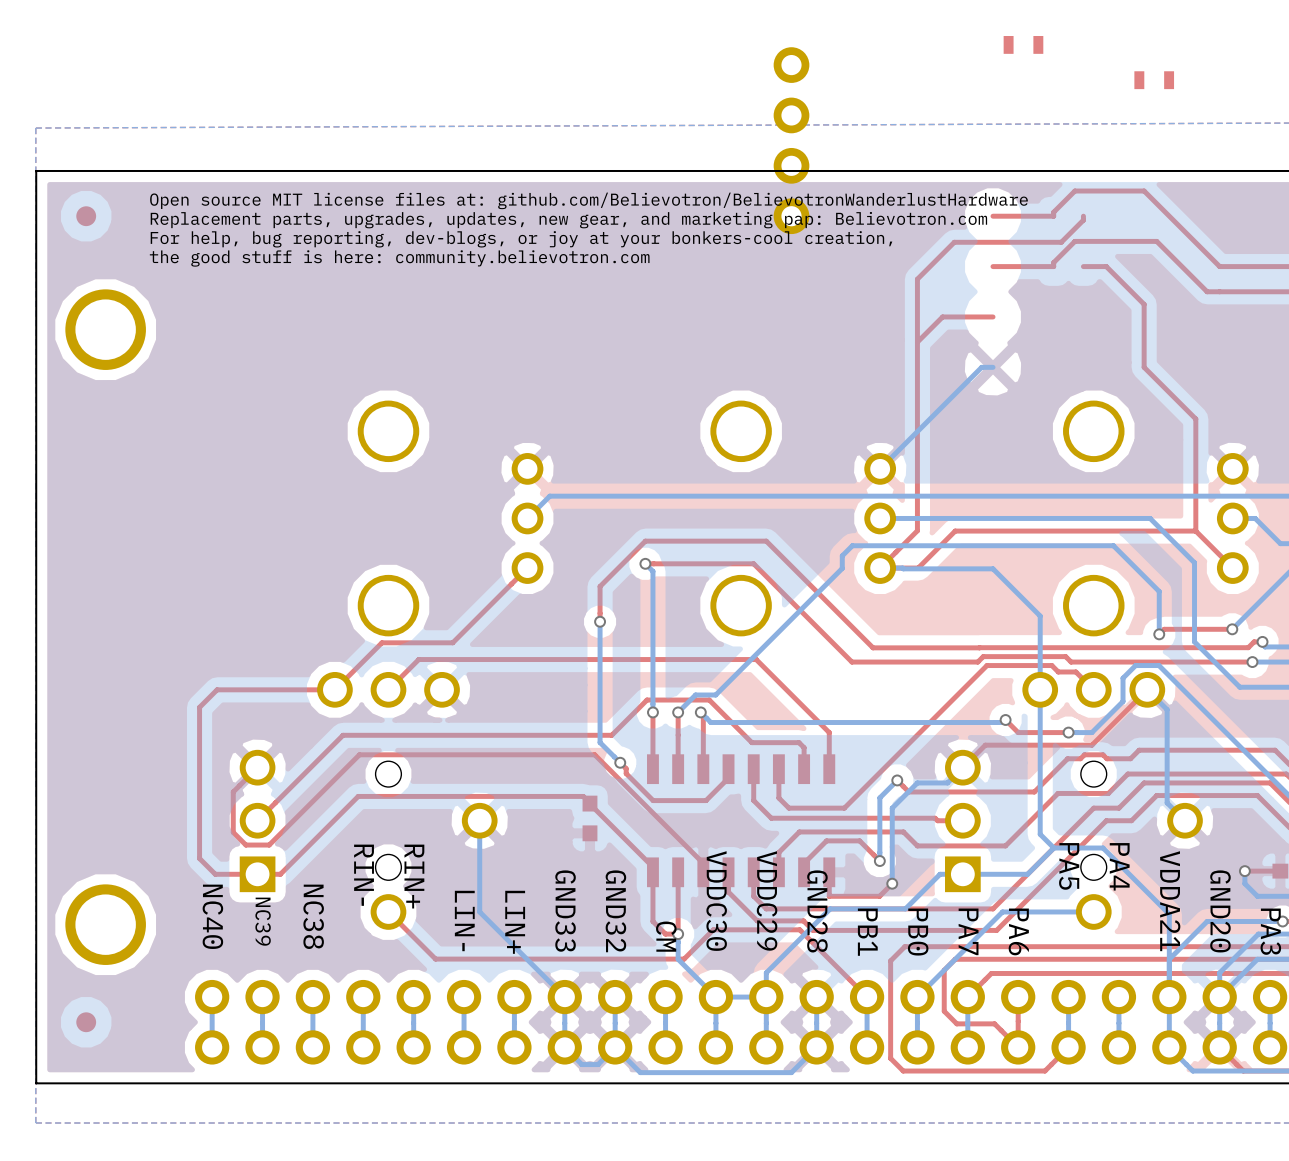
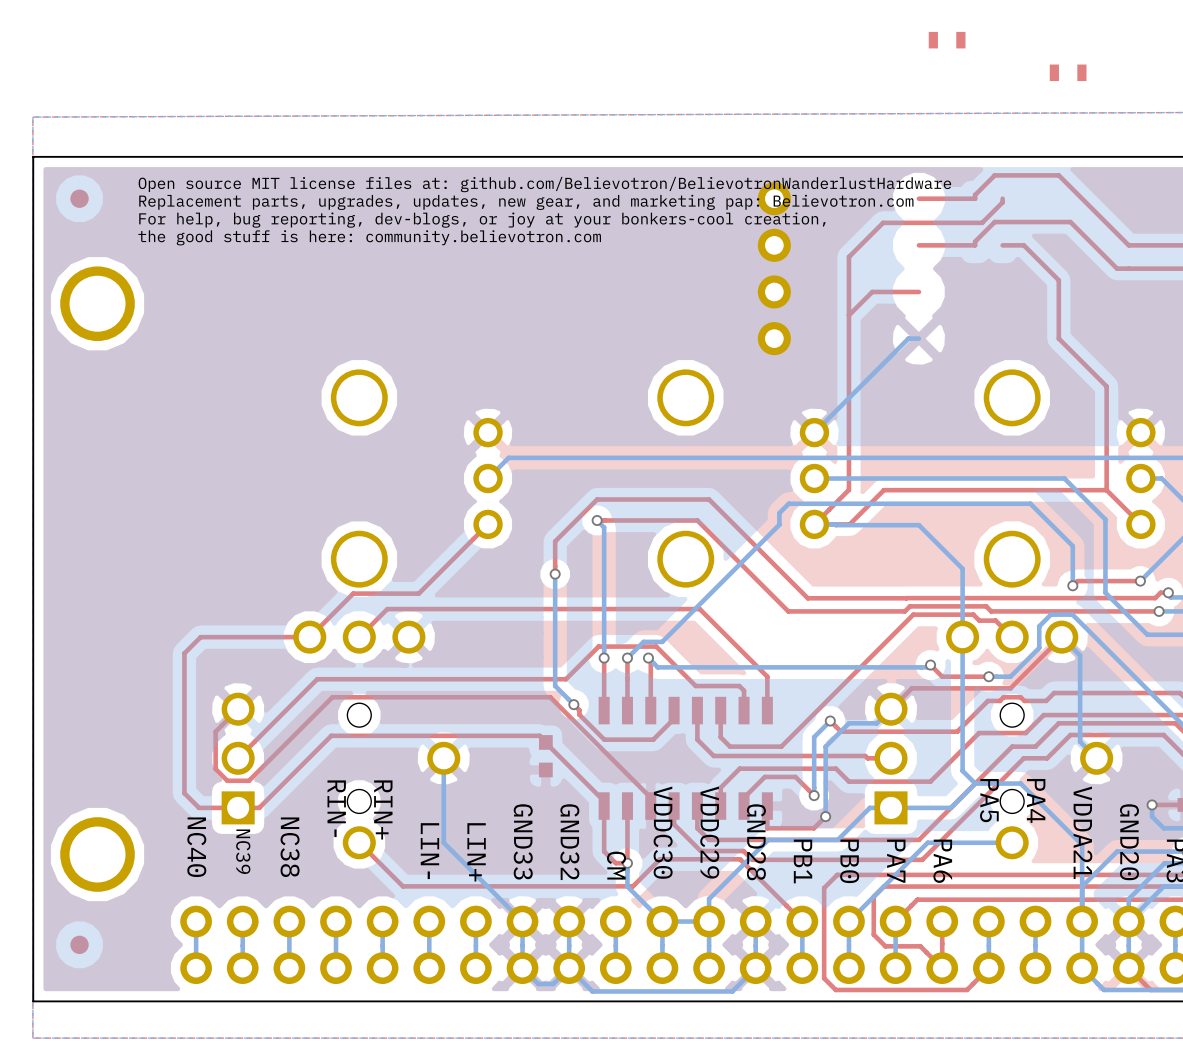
part position: (791, 140) -> (774, 268)

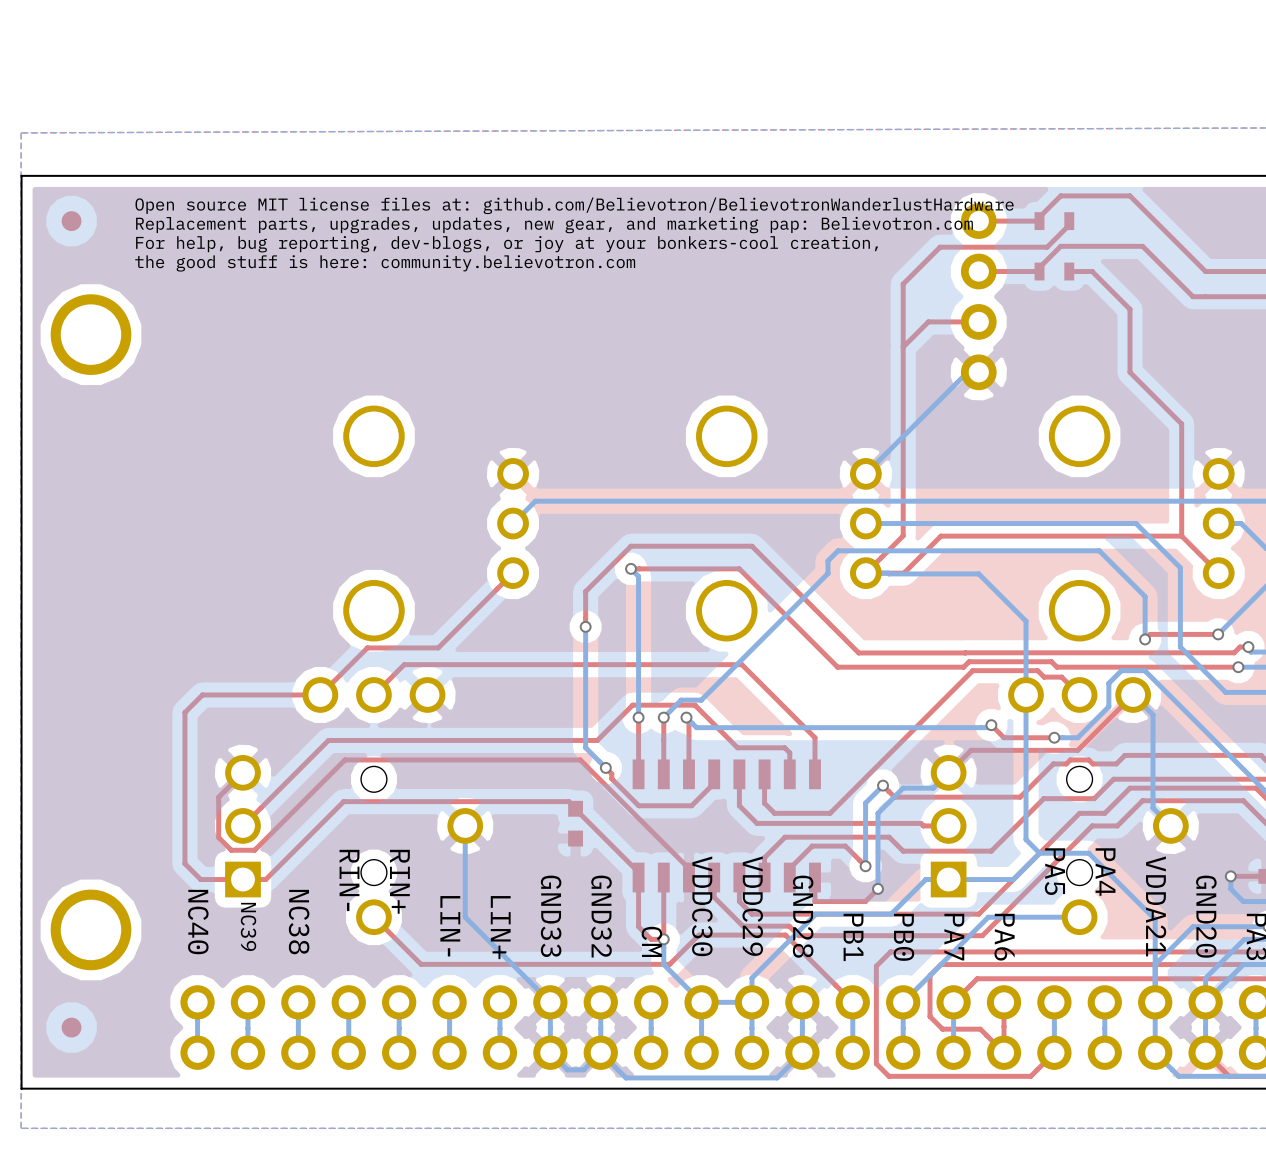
part: (947, 40) -> none
part: (1068, 72) -> none
part: none -> (1054, 221)
part: none -> (1054, 271)
part position: (774, 268) -> (978, 296)

